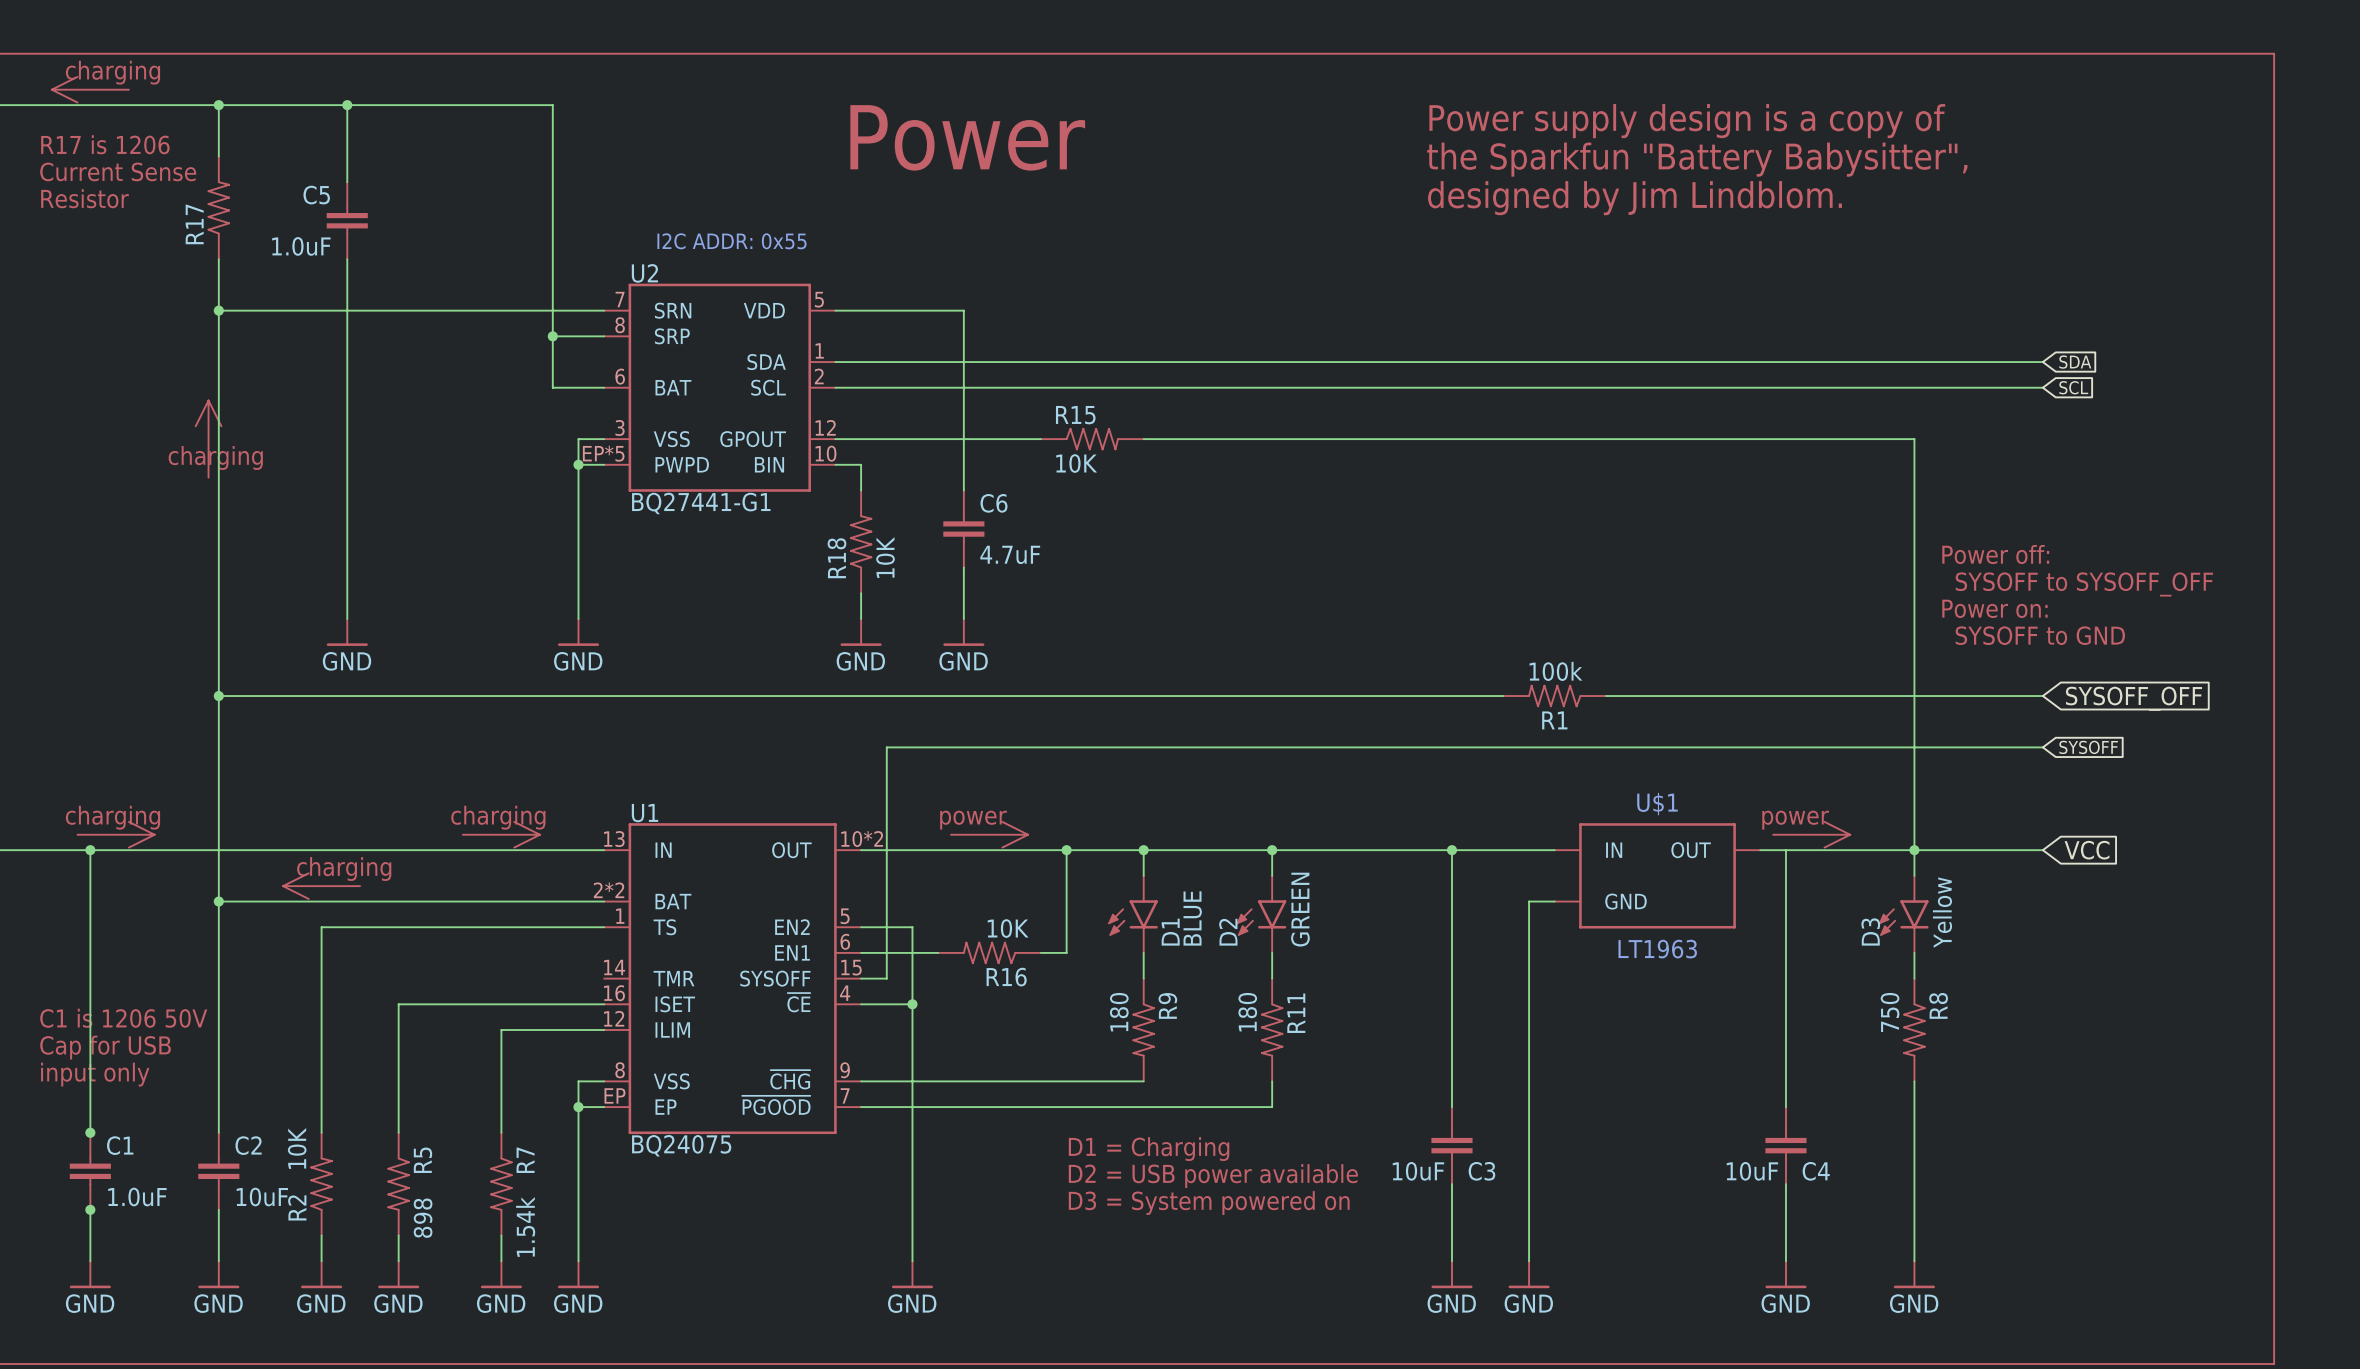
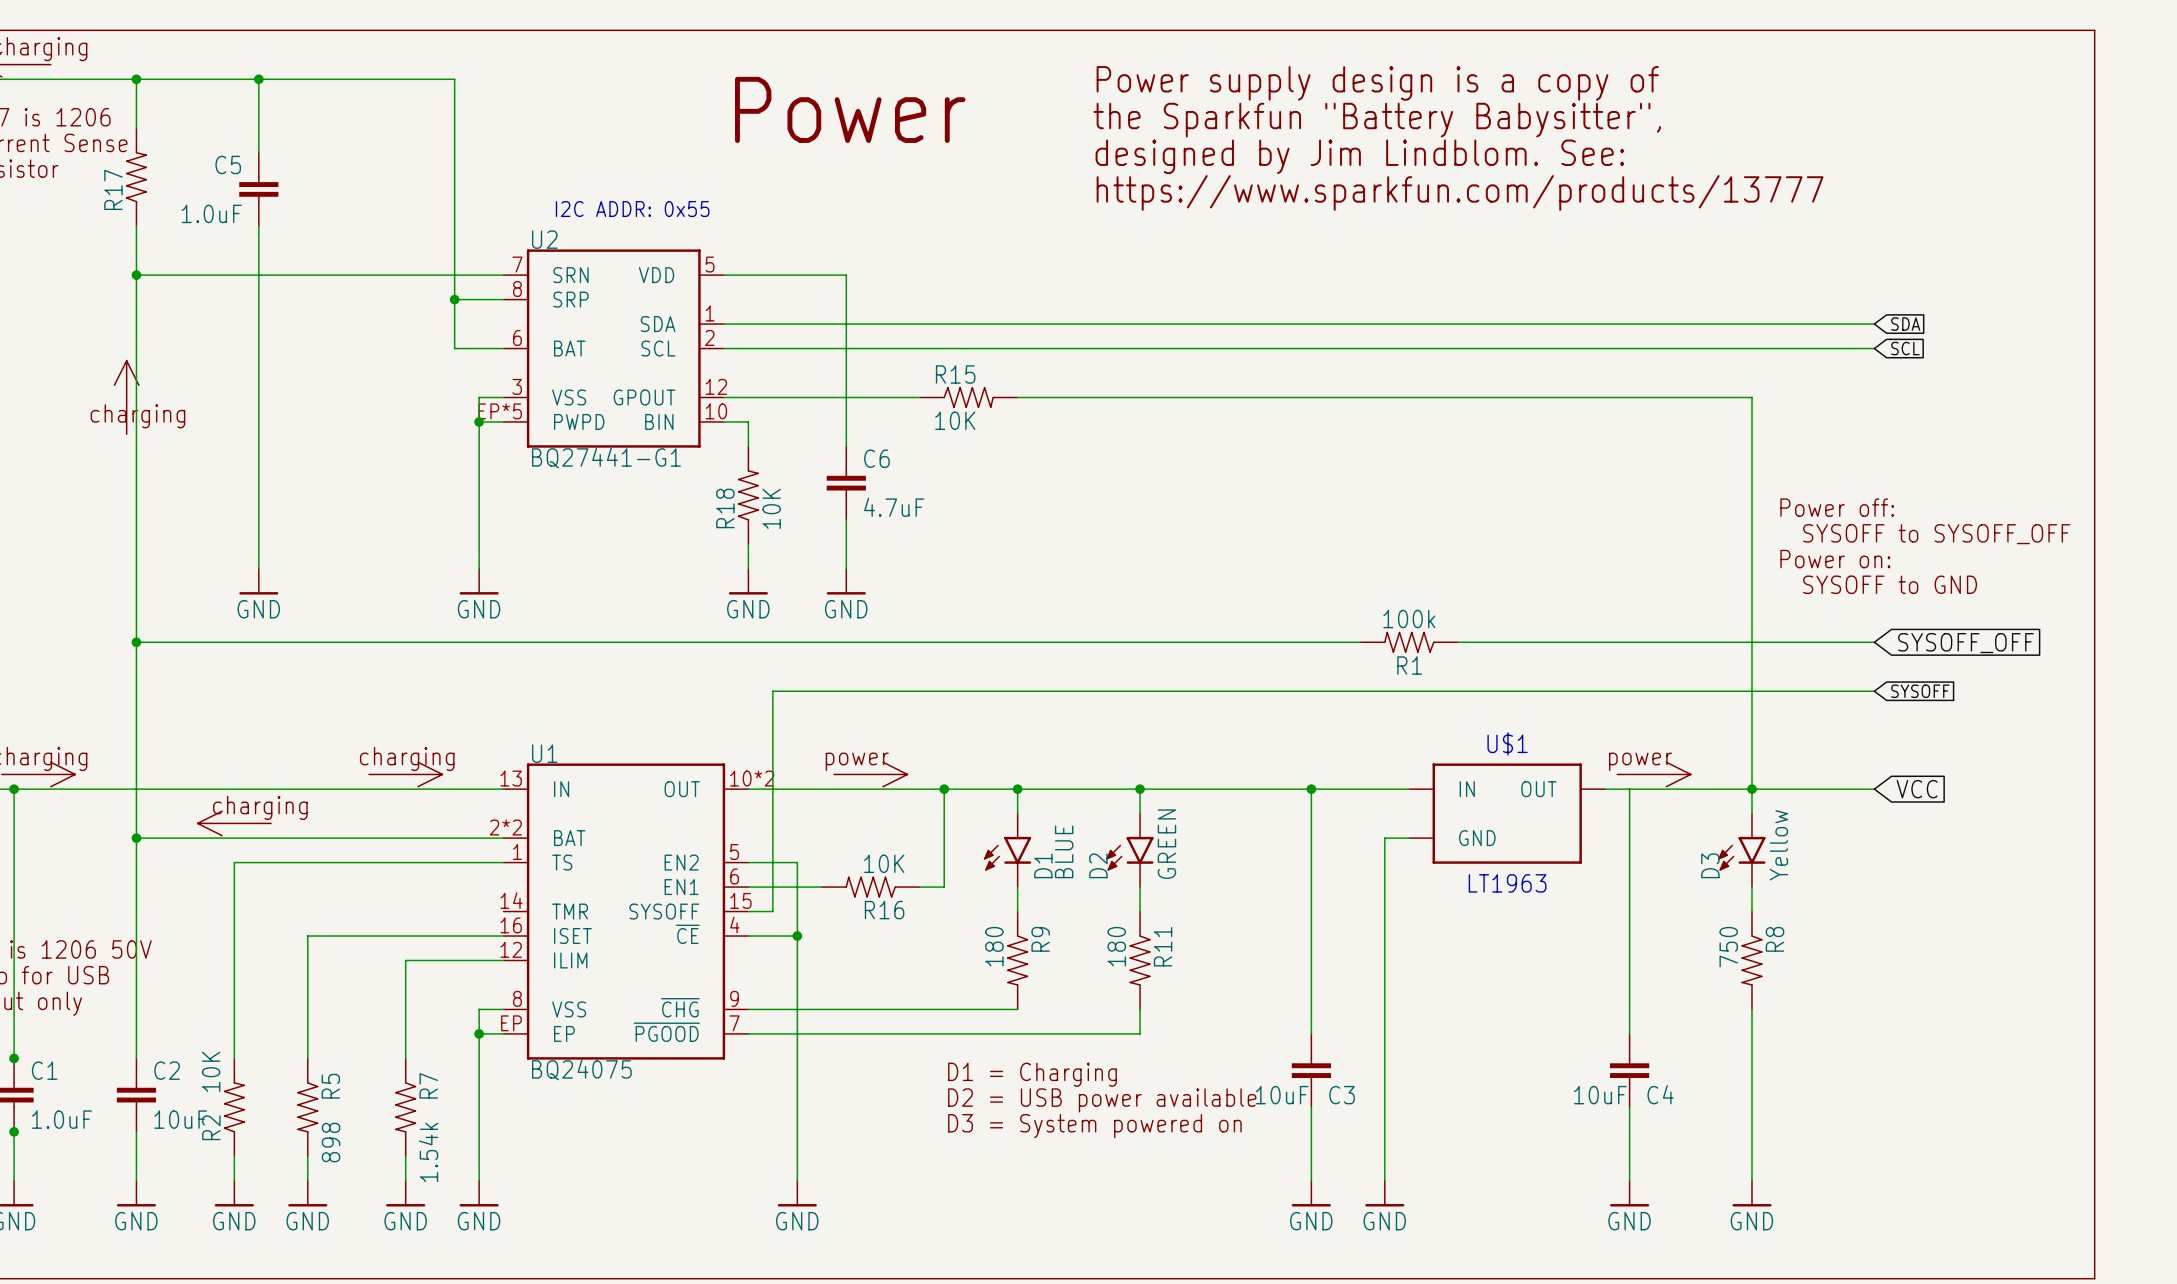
text position: Power supply design is a copy of (1687, 121) -> Power supply design is a copy of (1377, 83)
text position: the Sparkfun "Battery Babysitter", (1697, 159) -> the Sparkfun "Battery Babysitter", (1377, 120)
text: designed by Jim Lindblom. (1635, 198) -> designed by Jim Lindblom. See: (1359, 156)
text: none -> https://www.sparkfun.com/products/13777 (1460, 192)

